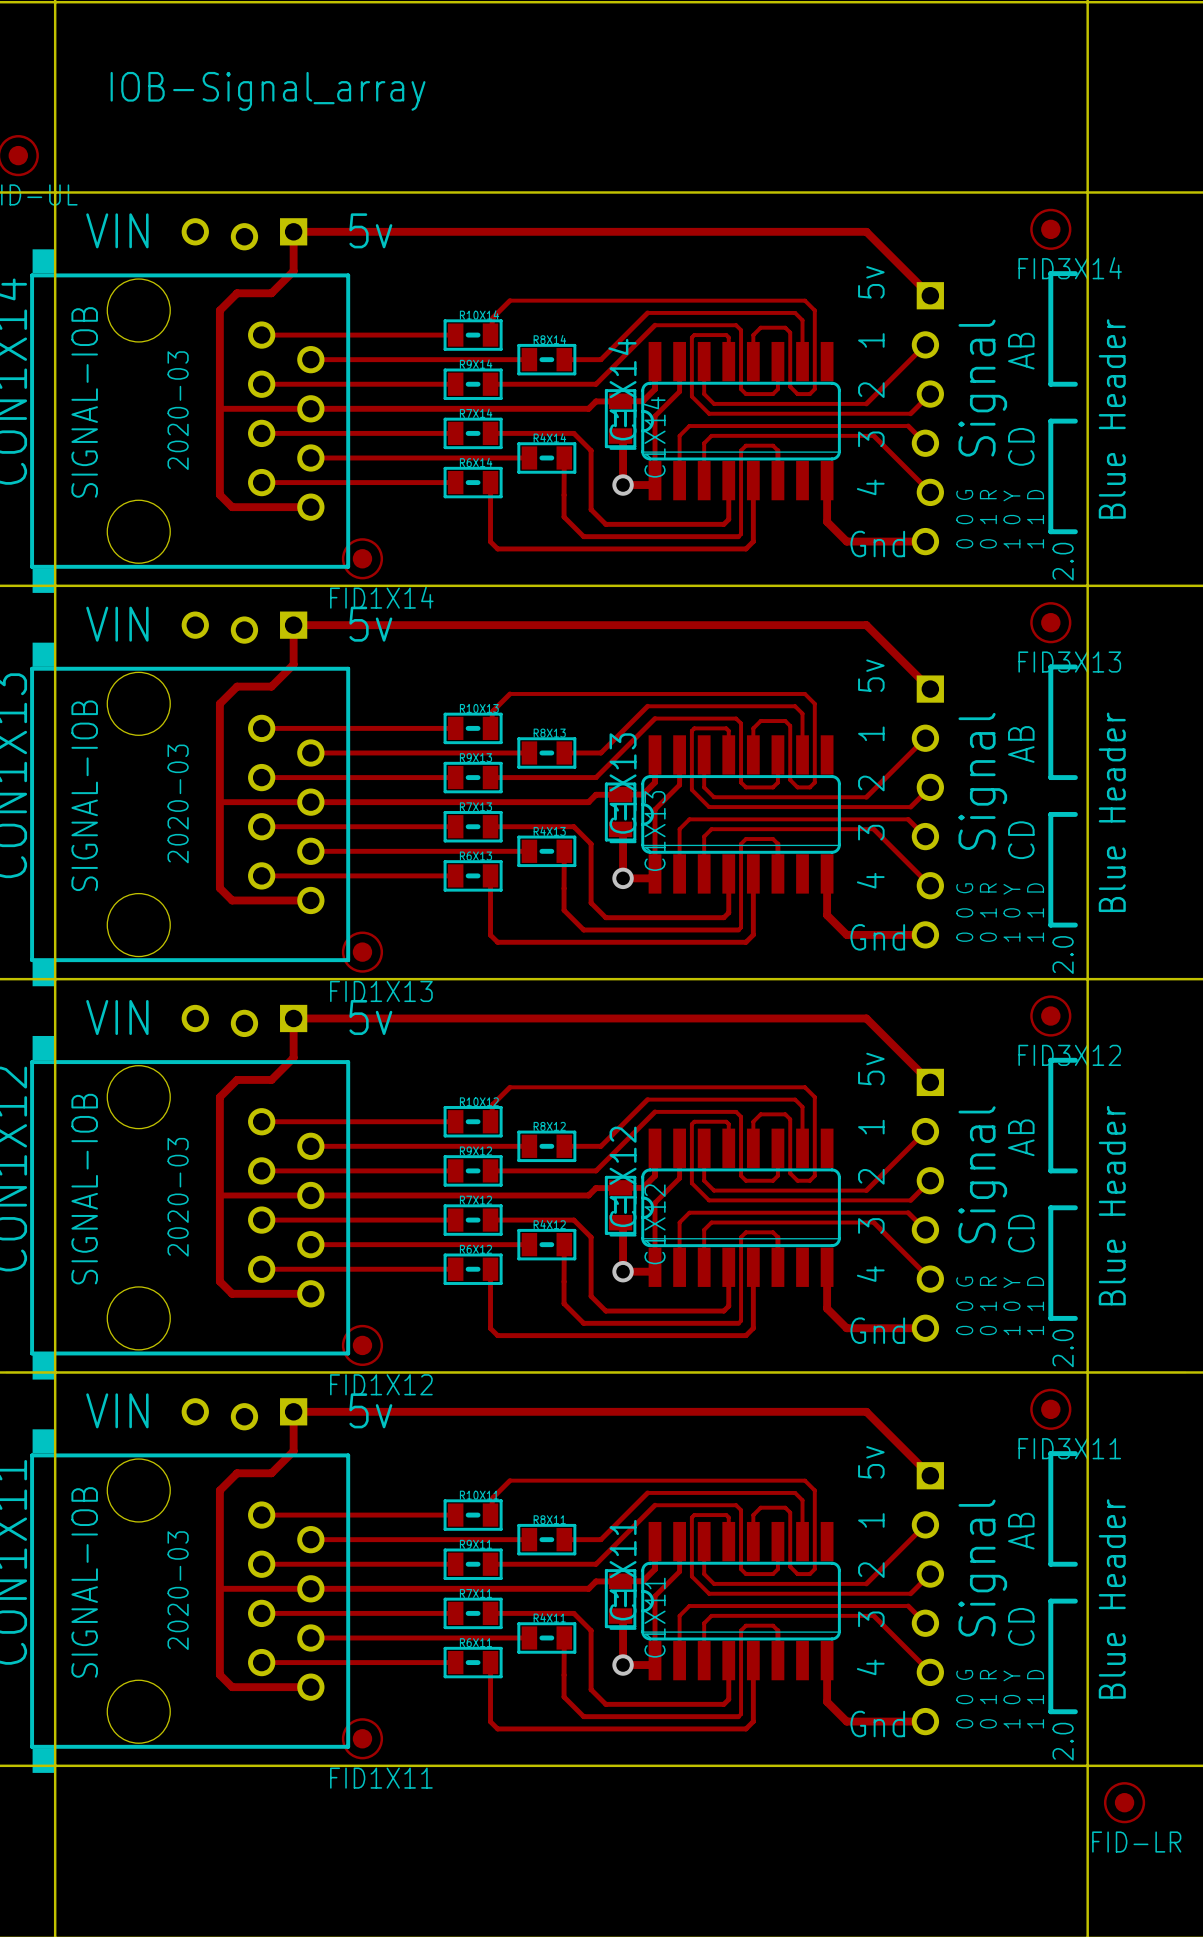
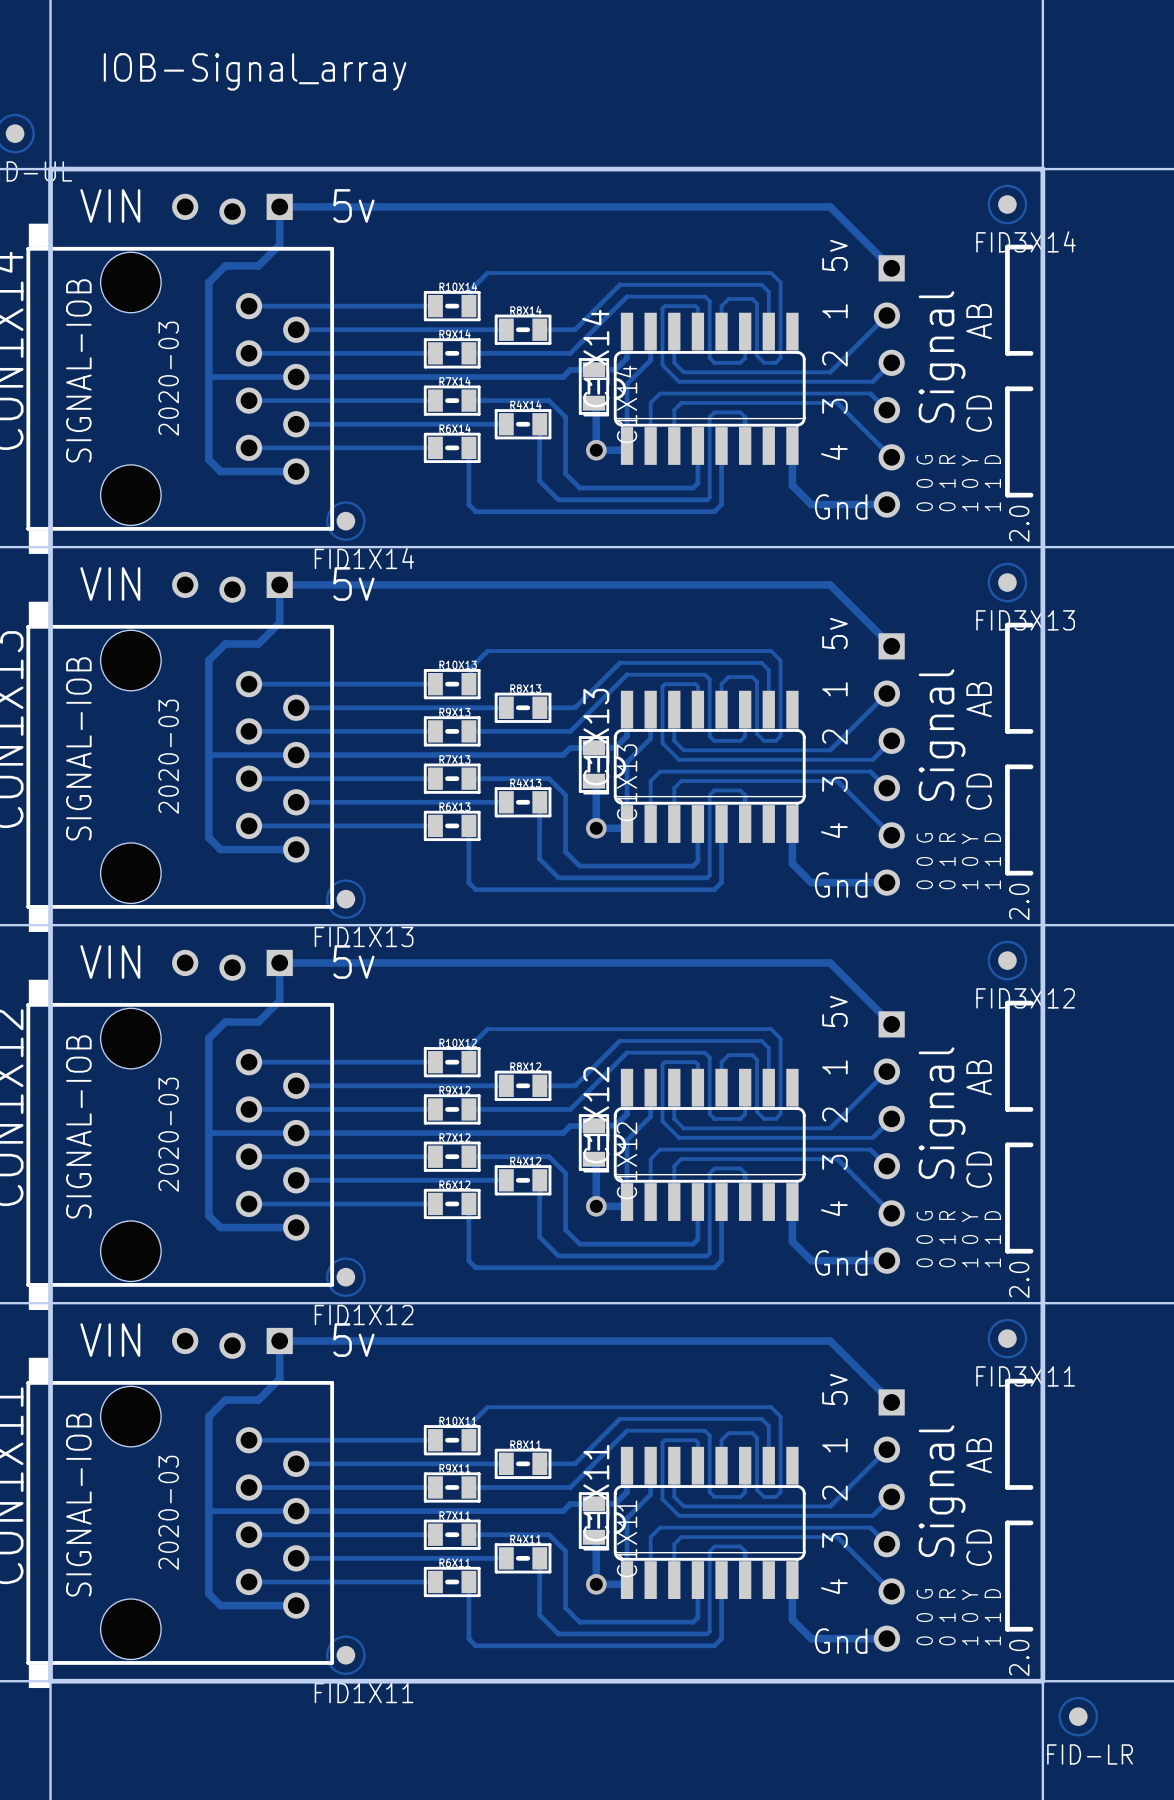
board edge: none -> (50, 169) (1042, 169) (1042, 1681) (50, 1681) (50, 169)
text: Blue Header (1112, 418) -> none
text: Blue Header (1112, 812) -> none
text: Blue Header (1112, 1205) -> none
text: Blue Header (1112, 1598) -> none

